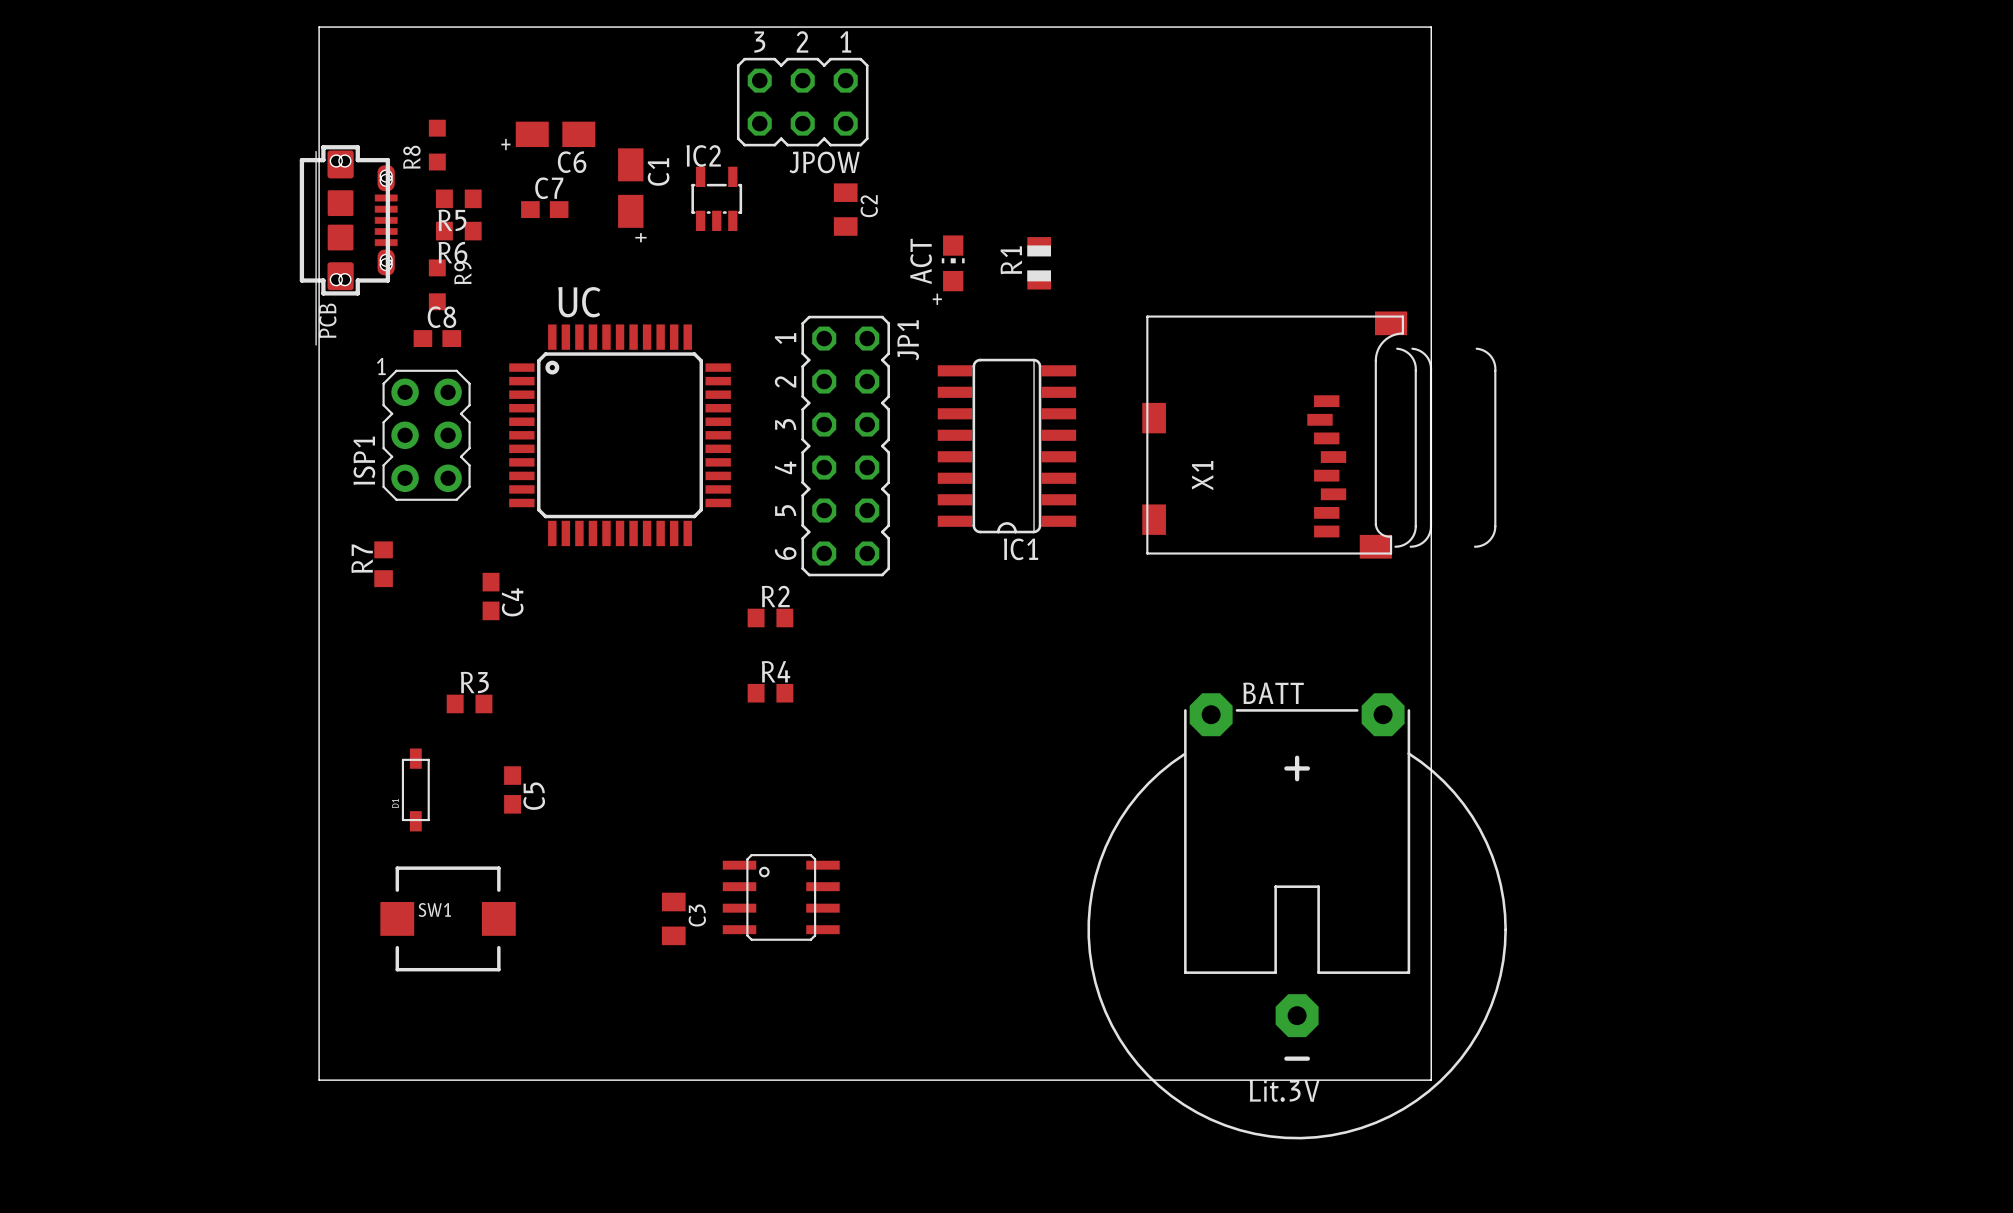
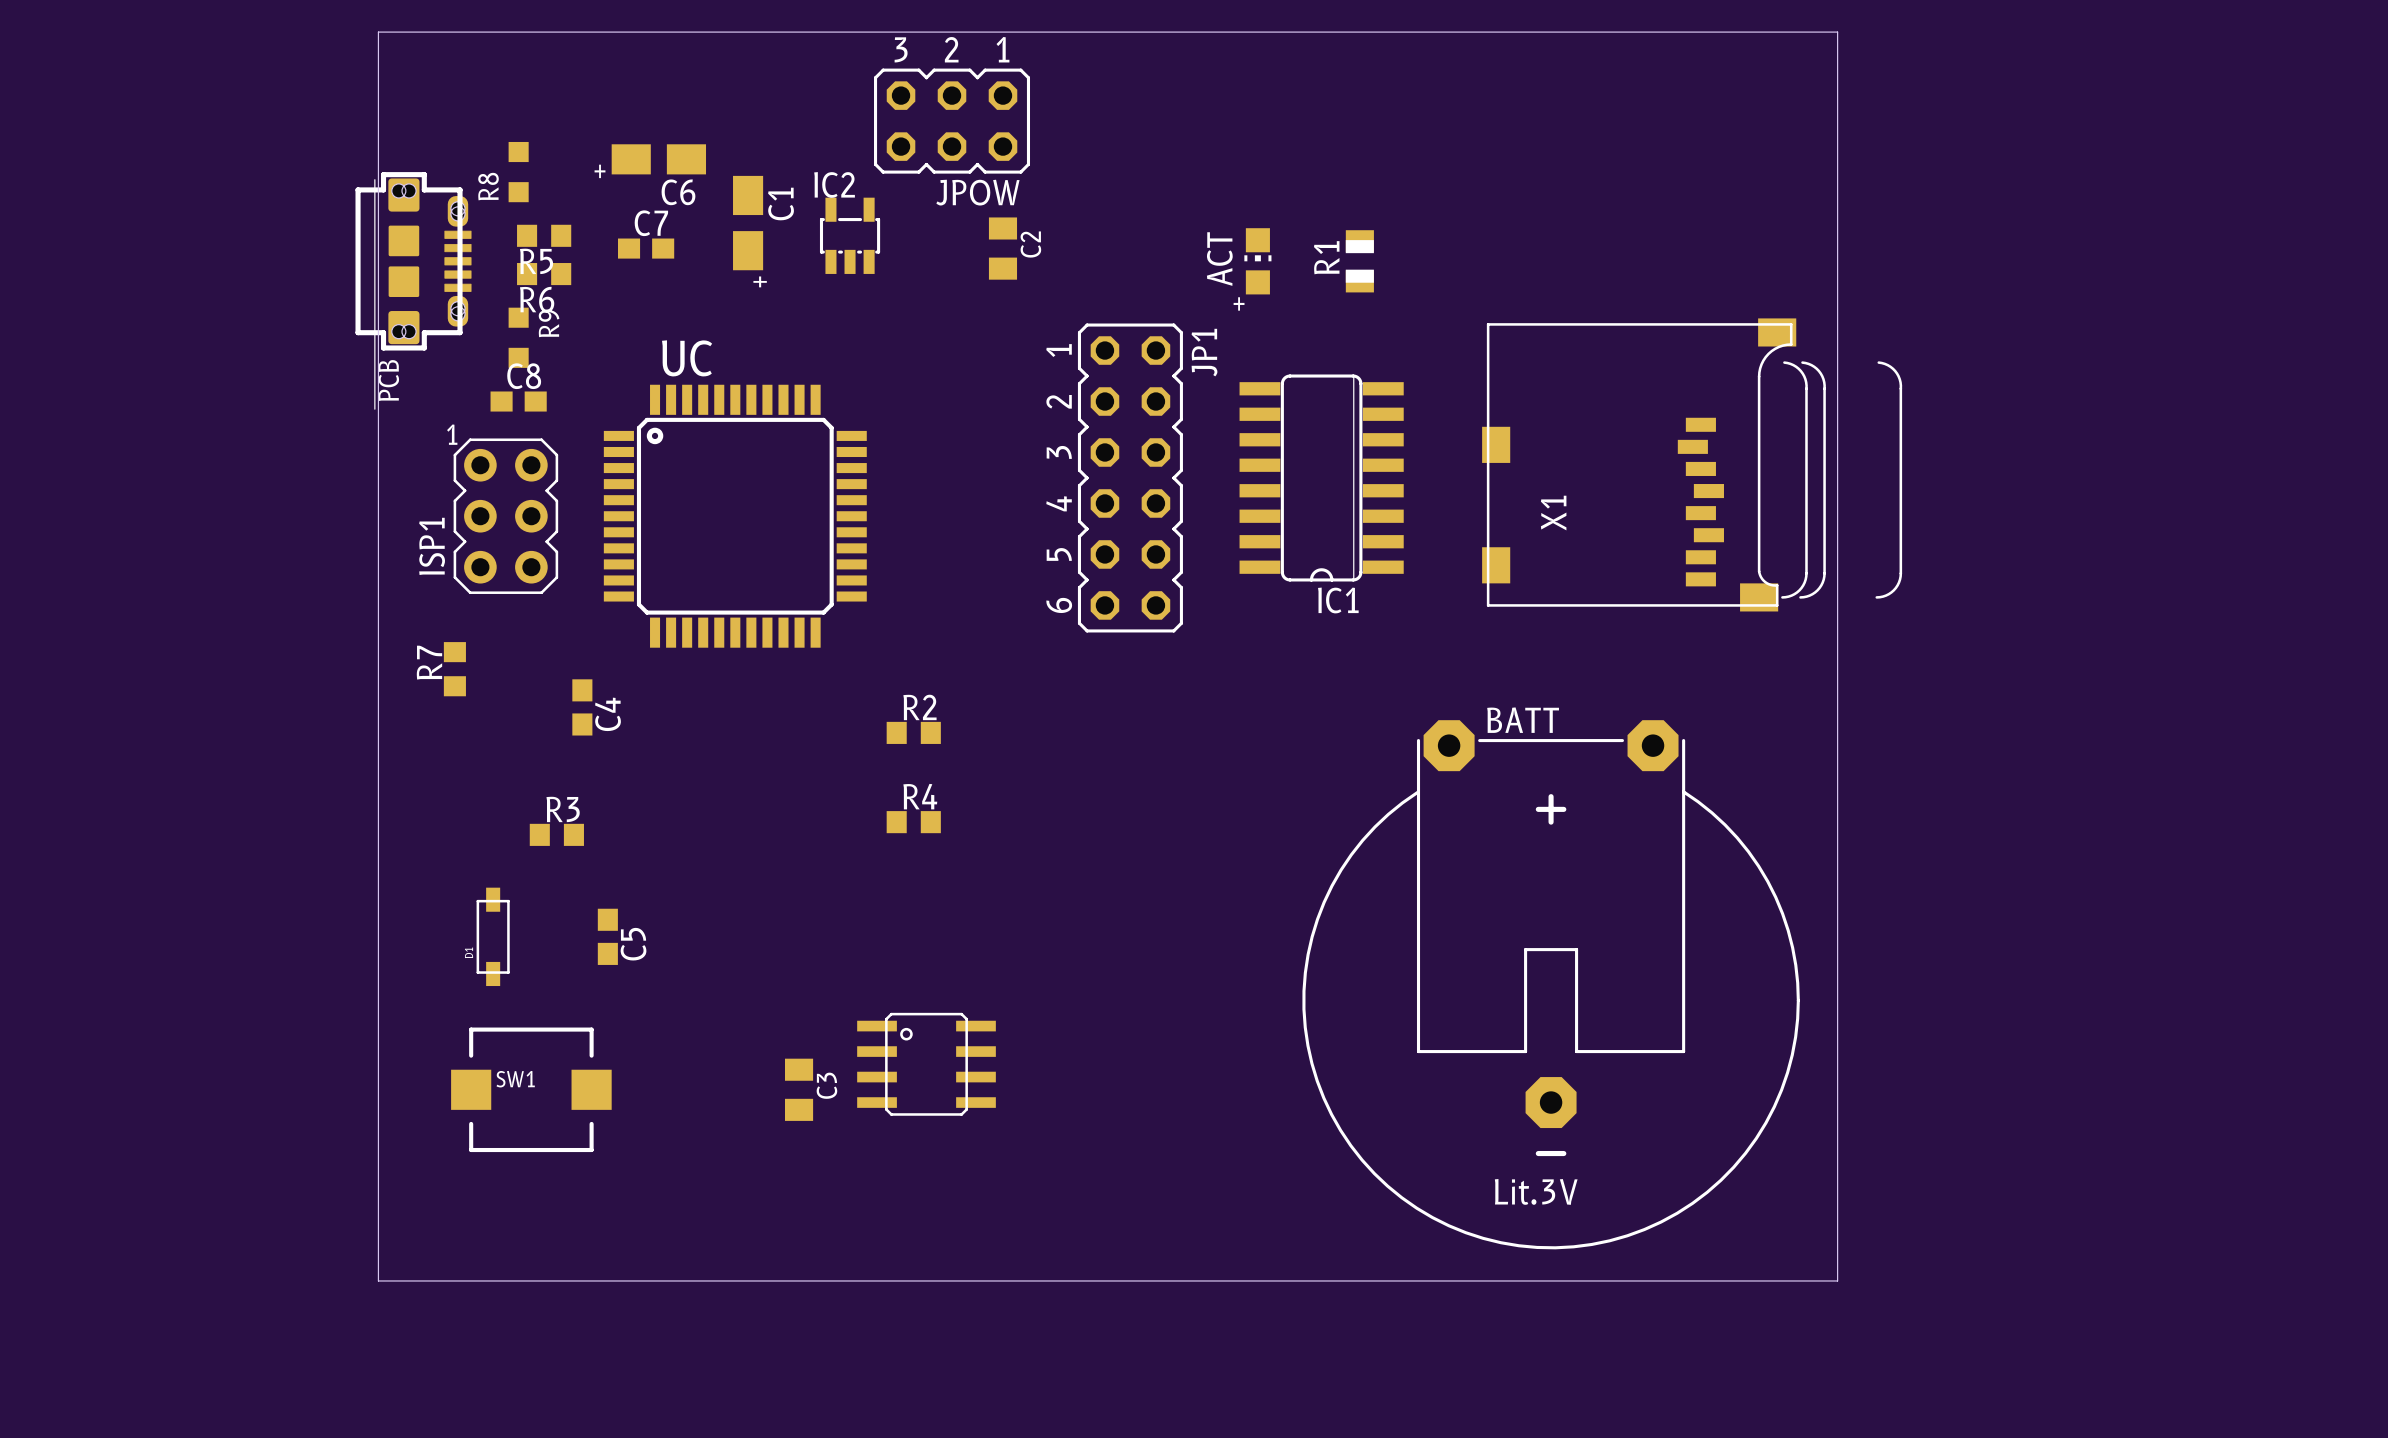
board edge: (1431, 27) (1431, 1080) -> (1697, 32) (1837, 32) (1837, 1280) (1697, 1280)
ACT position: (953, 263) -> (1257, 261)
R1 position: (1039, 263) -> (1359, 261)
X1 position: (1319, 435) -> (1692, 464)
JP1 position: (845, 446) -> (1130, 477)
IC1 position: (1006, 446) -> (1321, 477)
BATT position: (1297, 916) -> (1551, 984)

